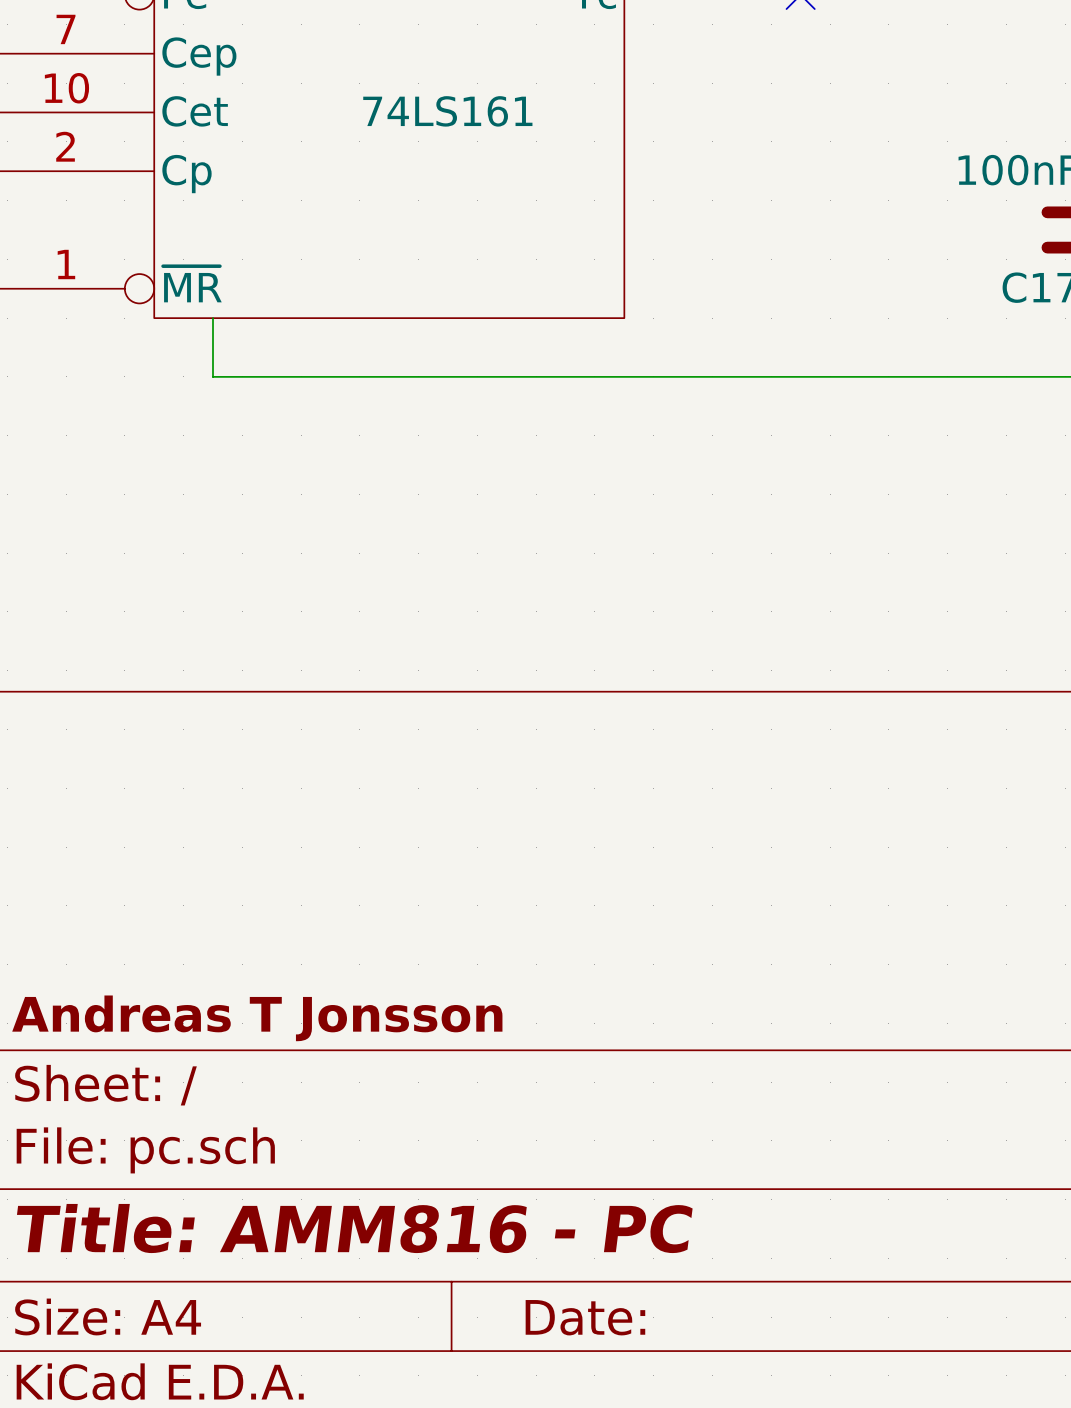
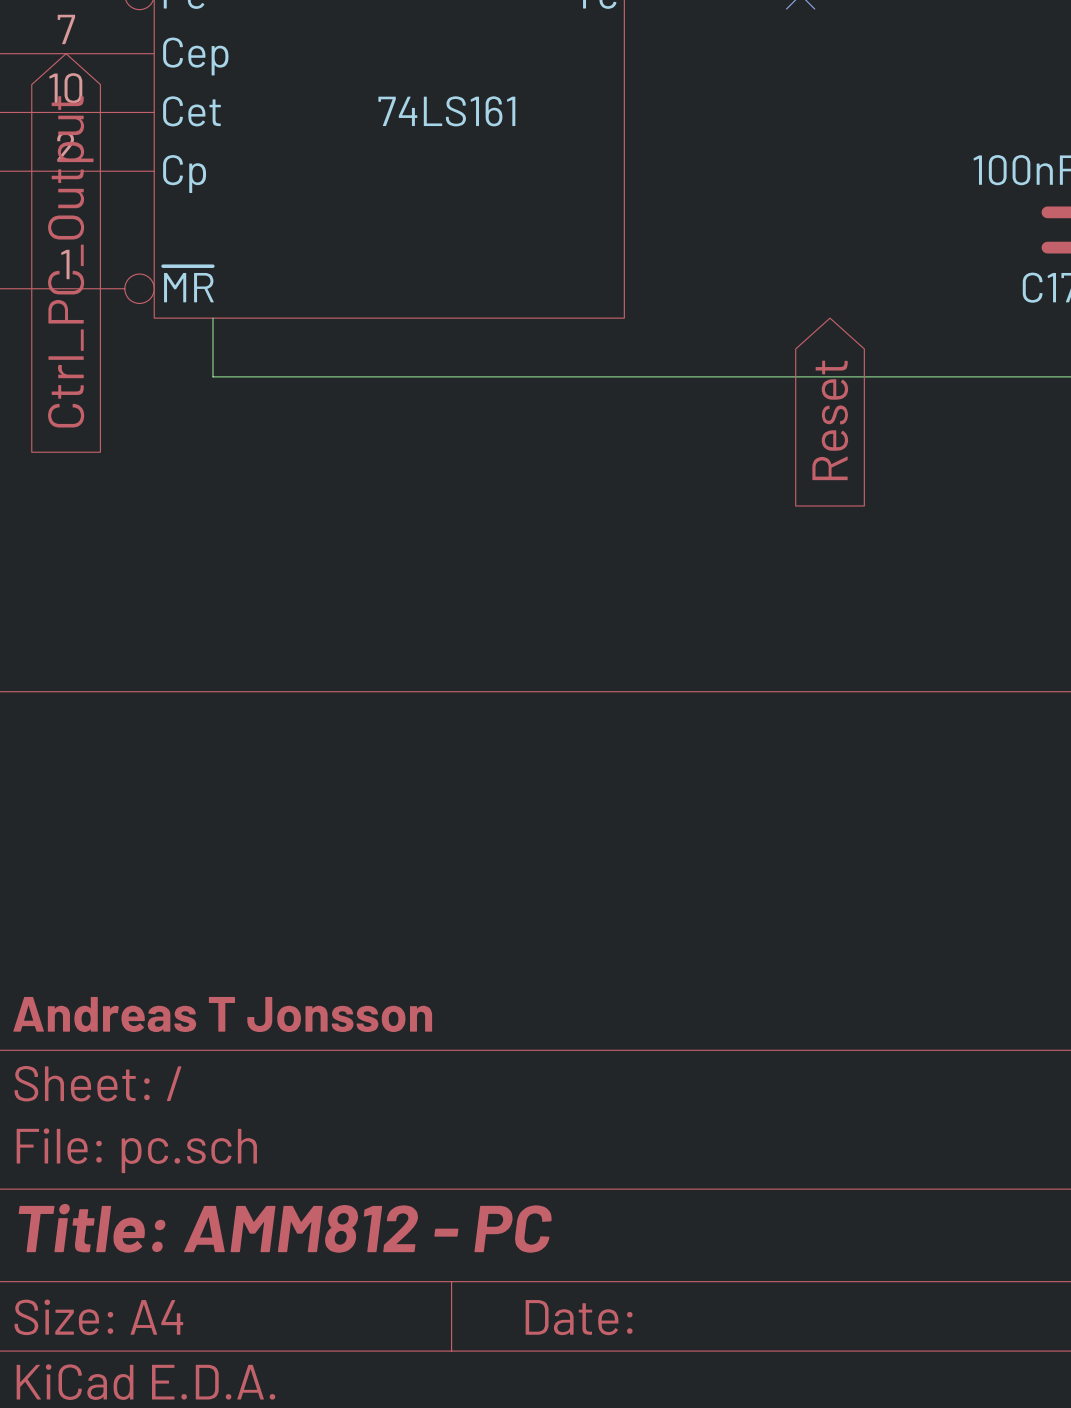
global label: none -> Ctrl_PC_Output (70, 261)
global label: none -> Reset (830, 420)
title block: Title: AMM816 - PC (354, 1228) -> Title: AMM812 - PC (285, 1228)

